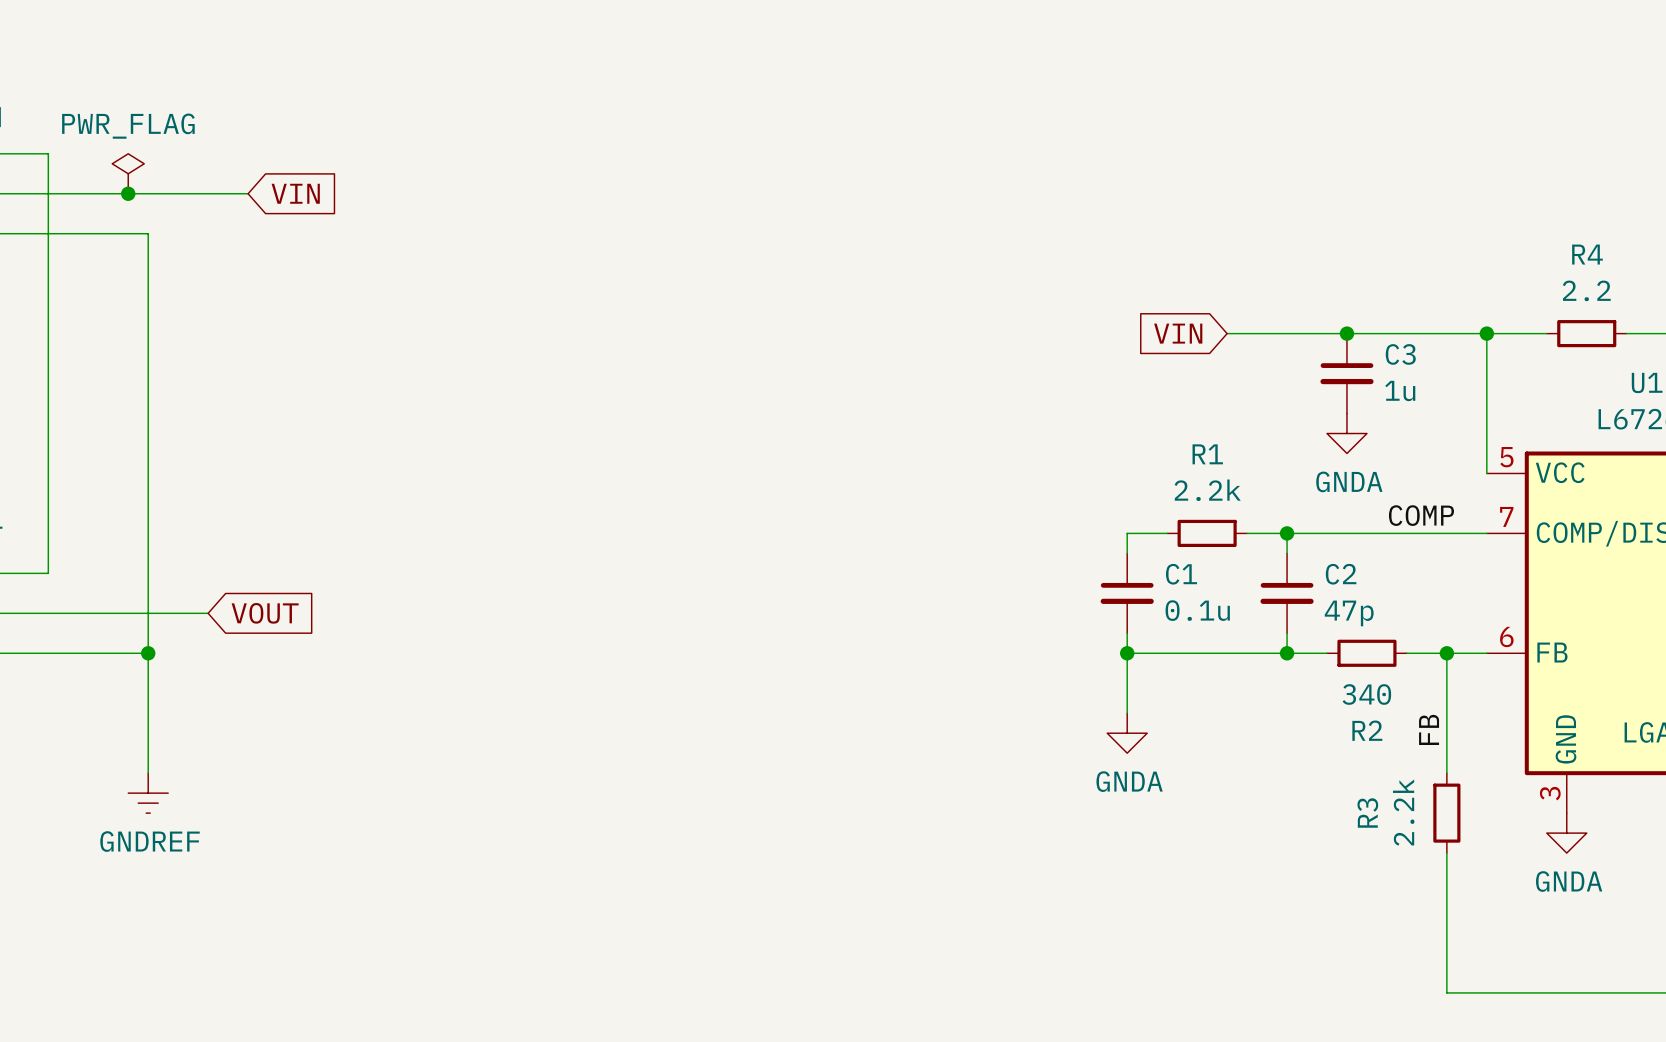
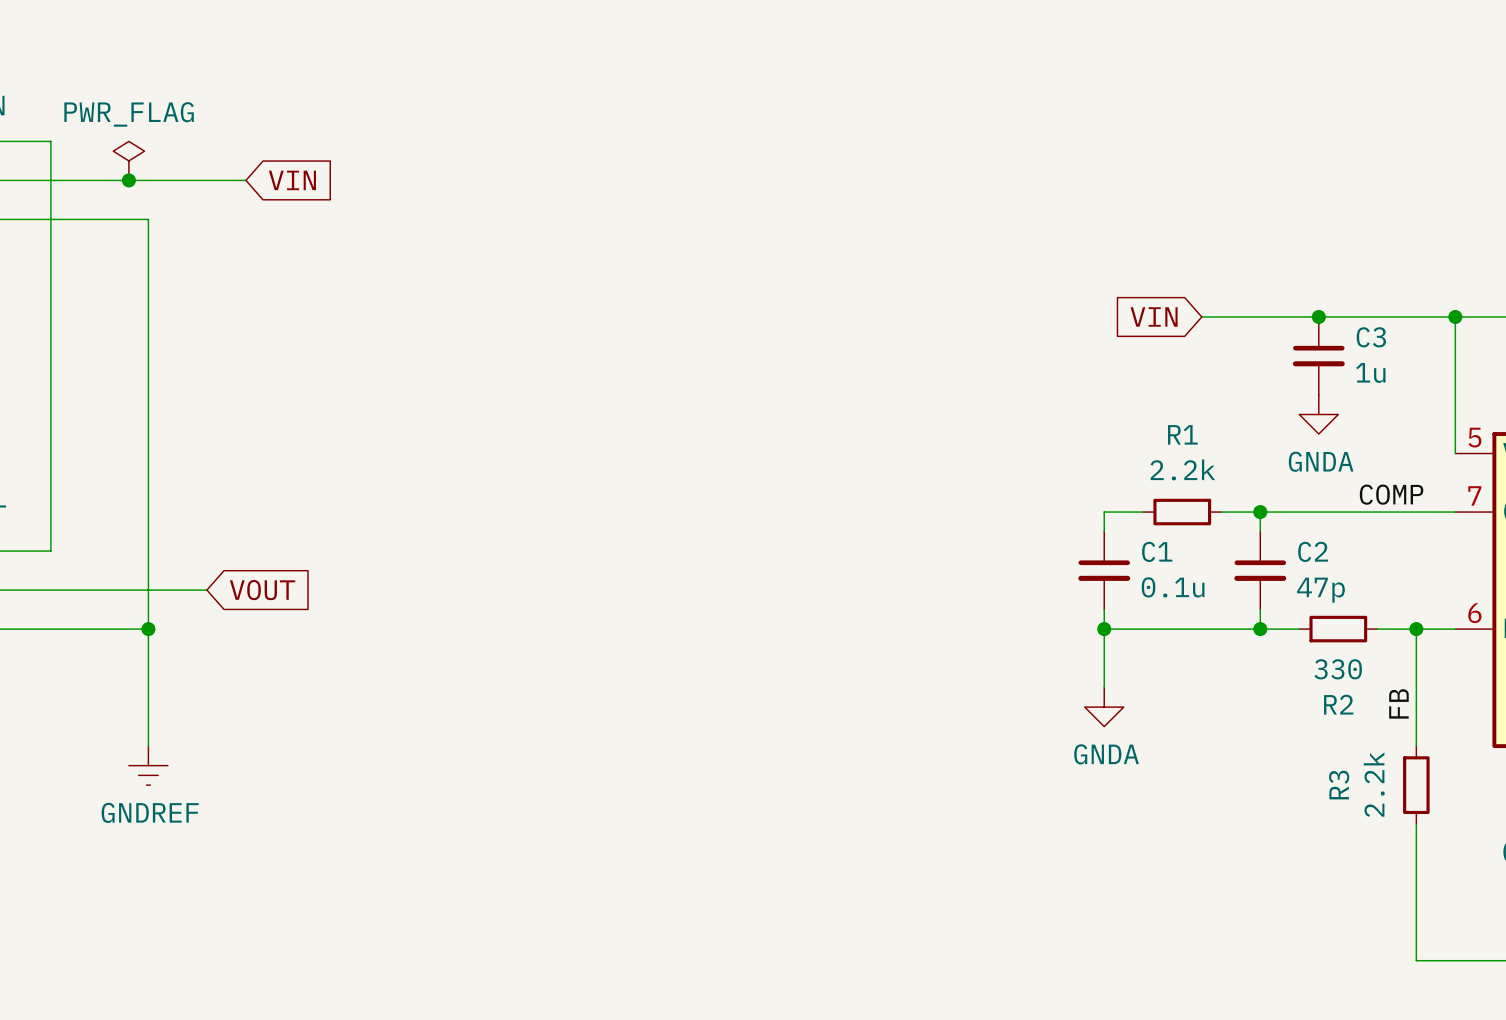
R2 value: 340 (1366, 694) -> 330 (1338, 669)

